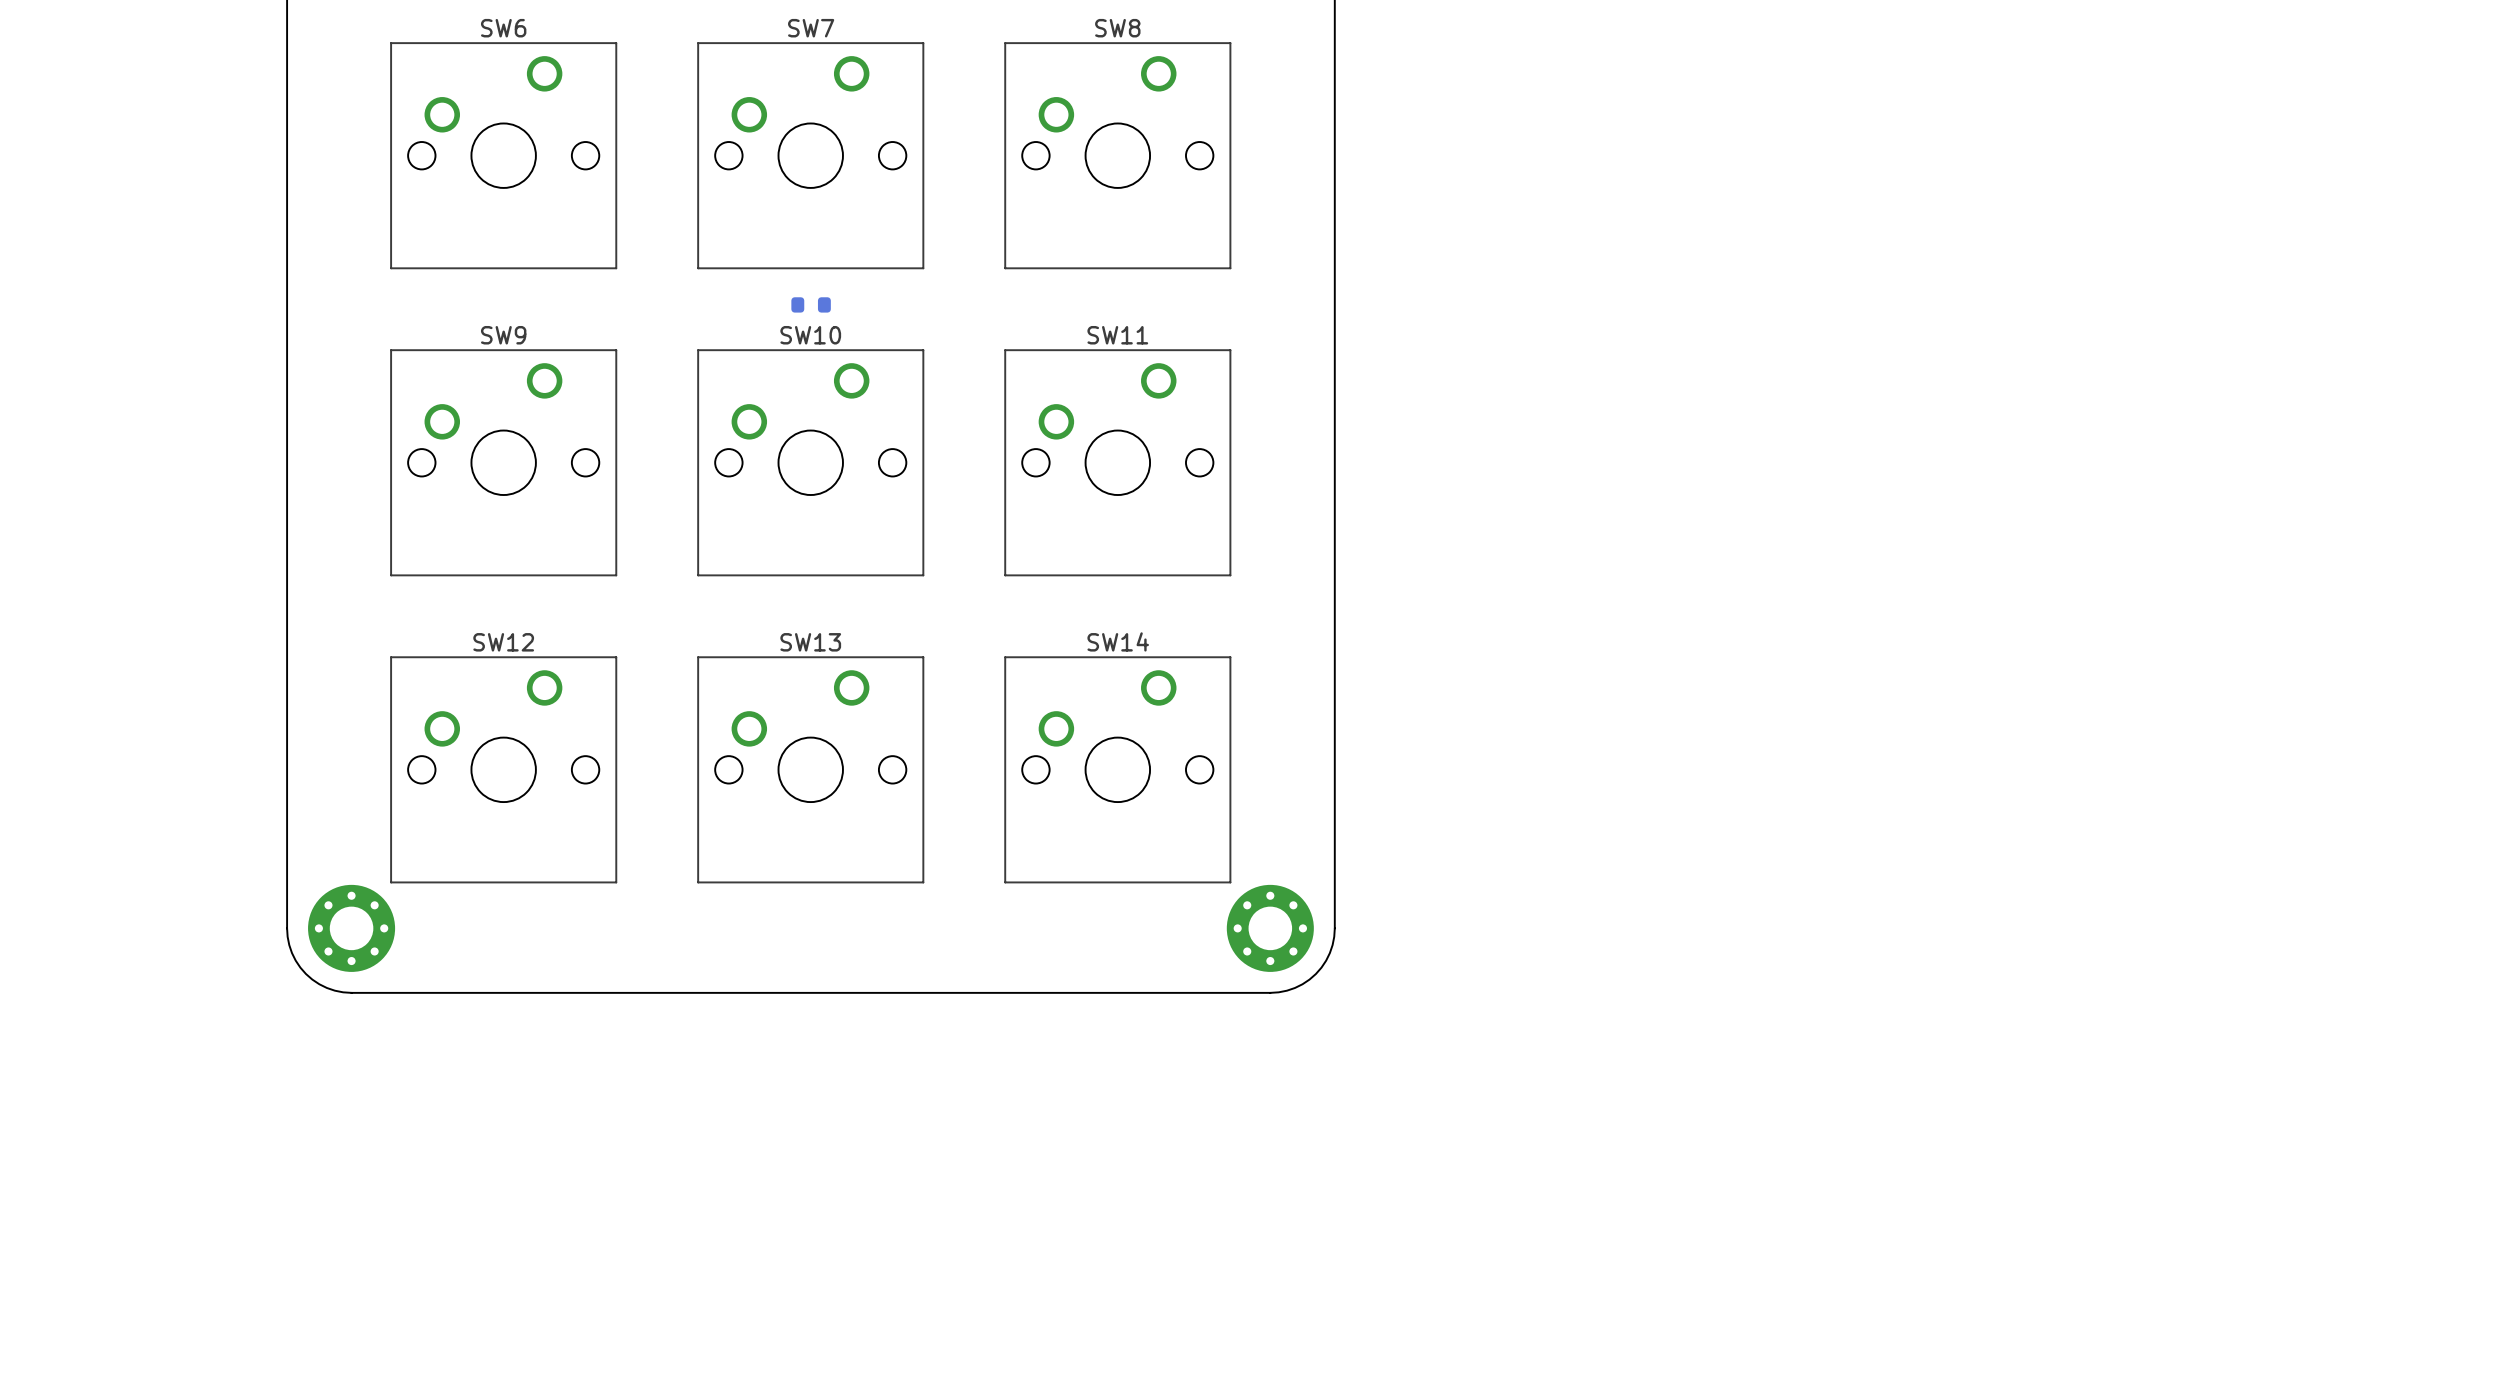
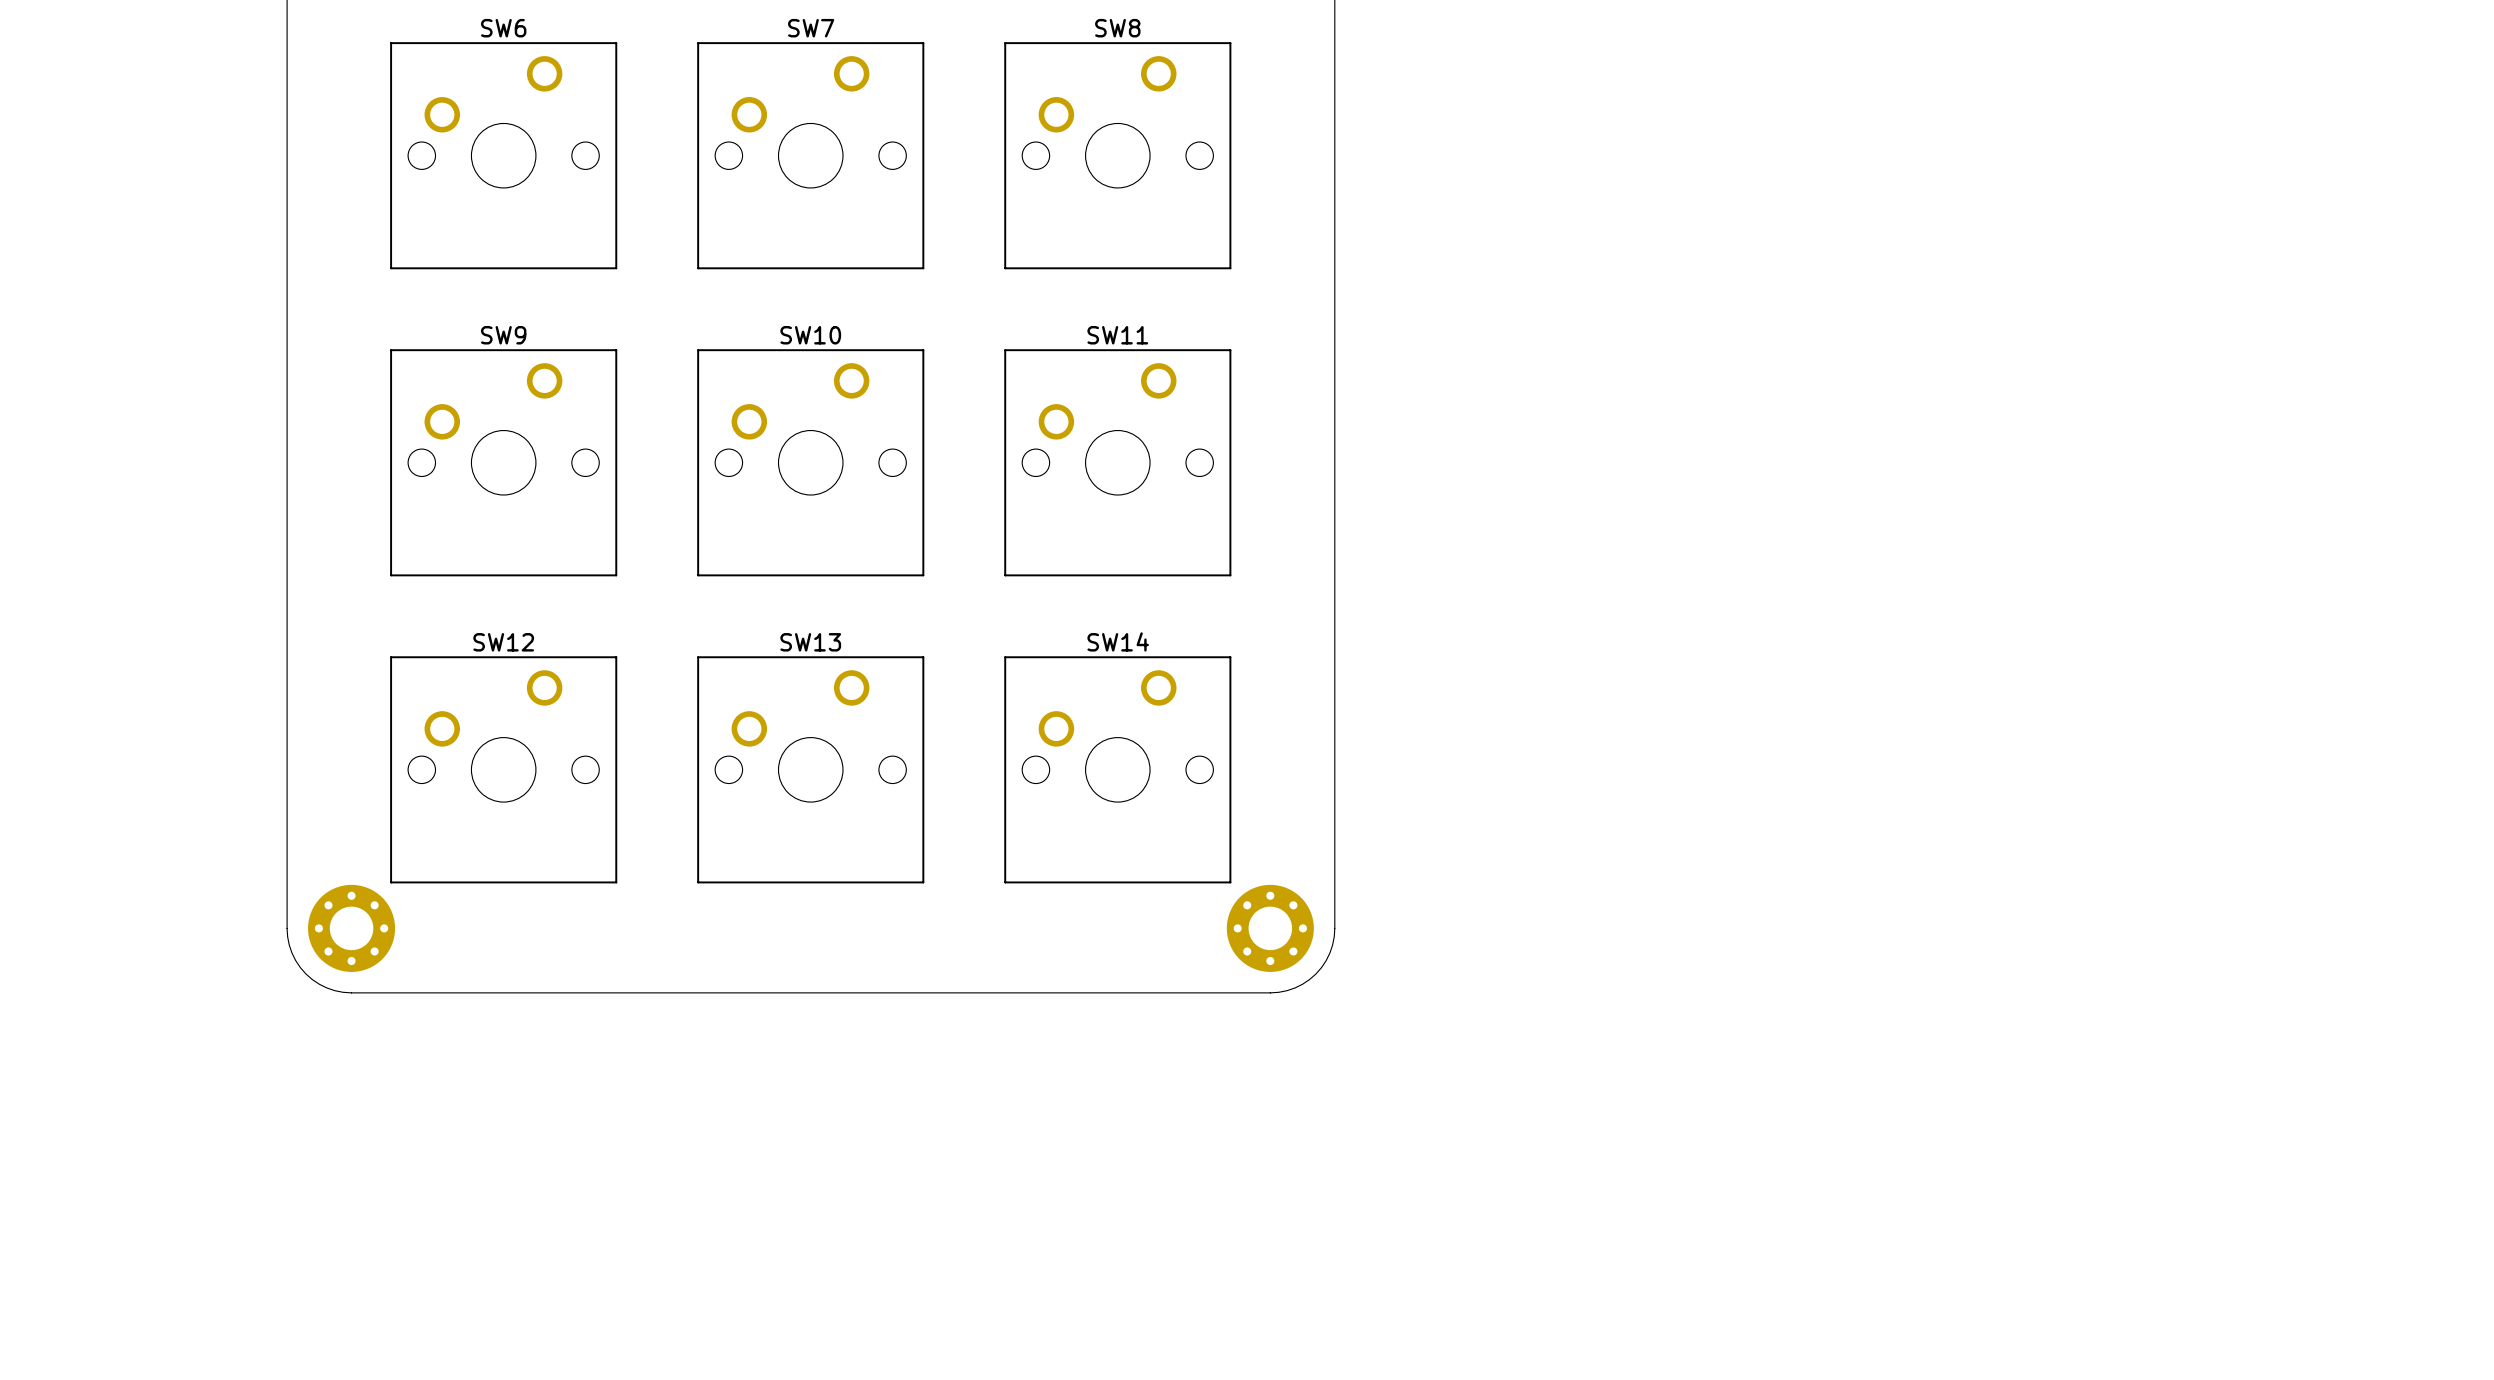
part: (811, 304) -> none

